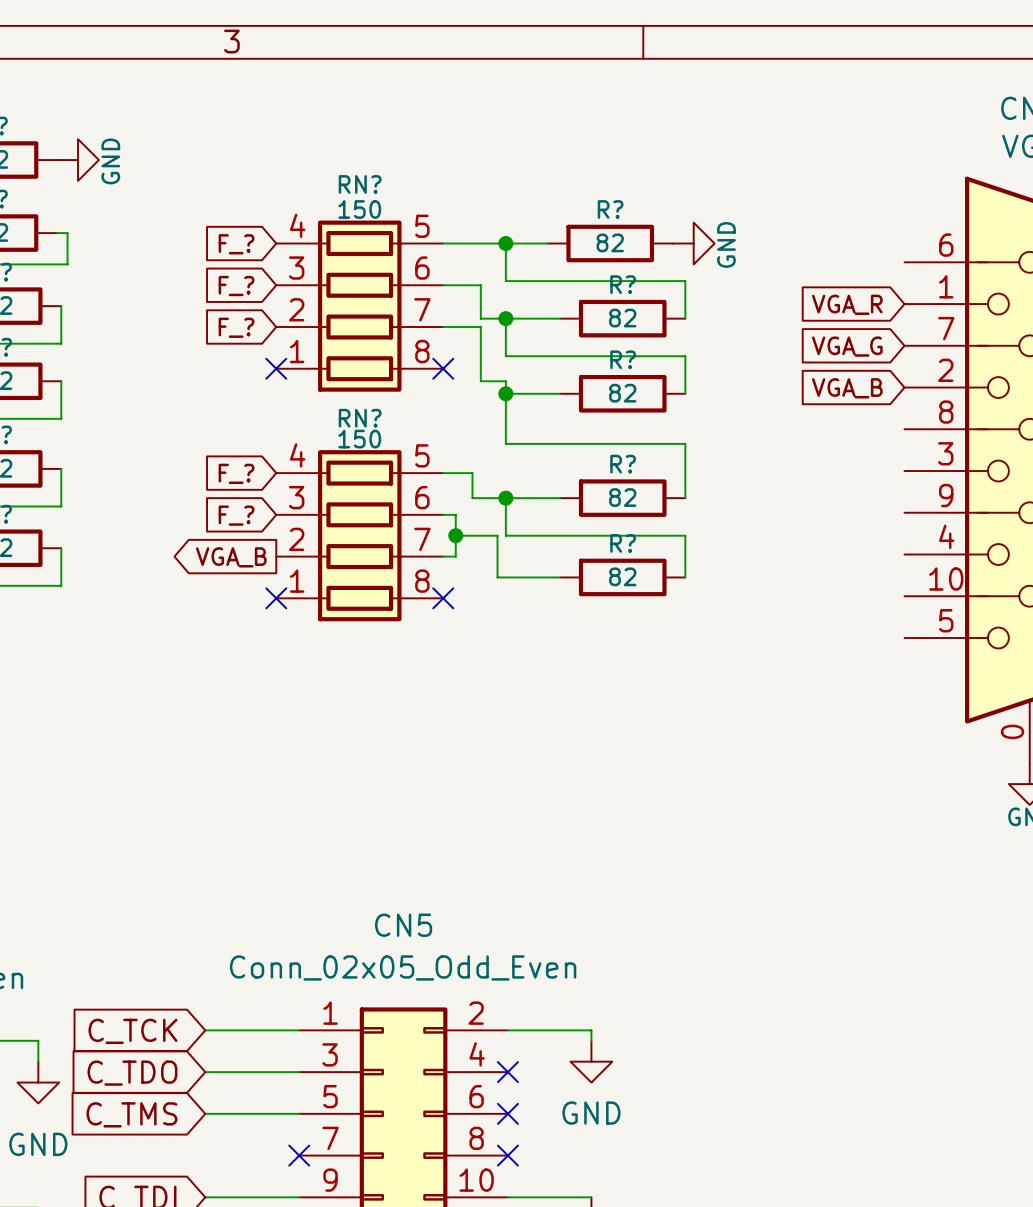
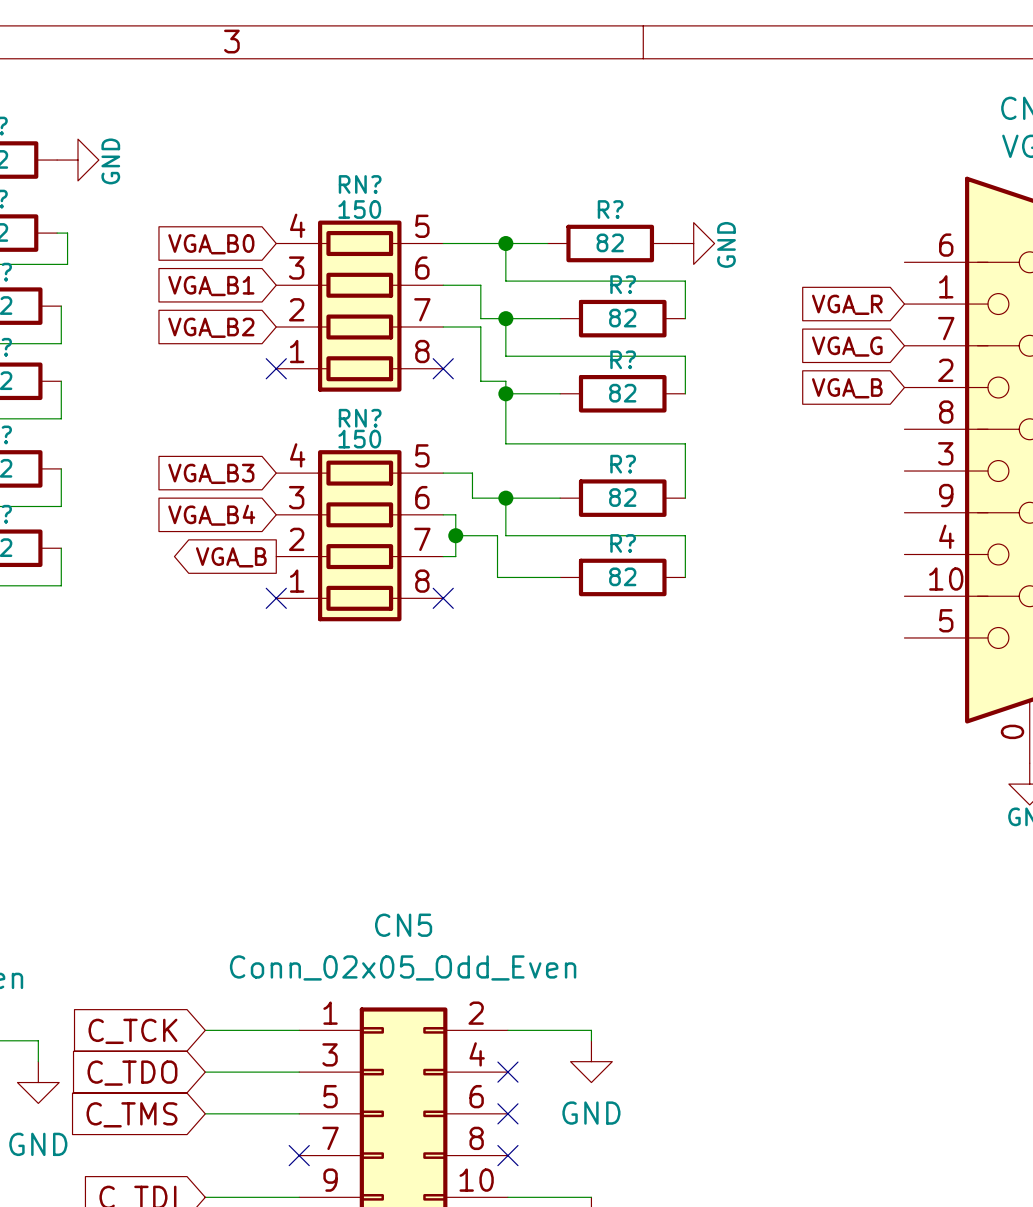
global label: F_? (236, 244) -> VGA_B0 (211, 244)
global label: F_? (236, 286) -> VGA_B1 (211, 286)
global label: F_? (236, 327) -> VGA_B2 (211, 327)
global label: F_? (236, 473) -> VGA_B3 (211, 473)
global label: F_? (236, 515) -> VGA_B4 (211, 515)

